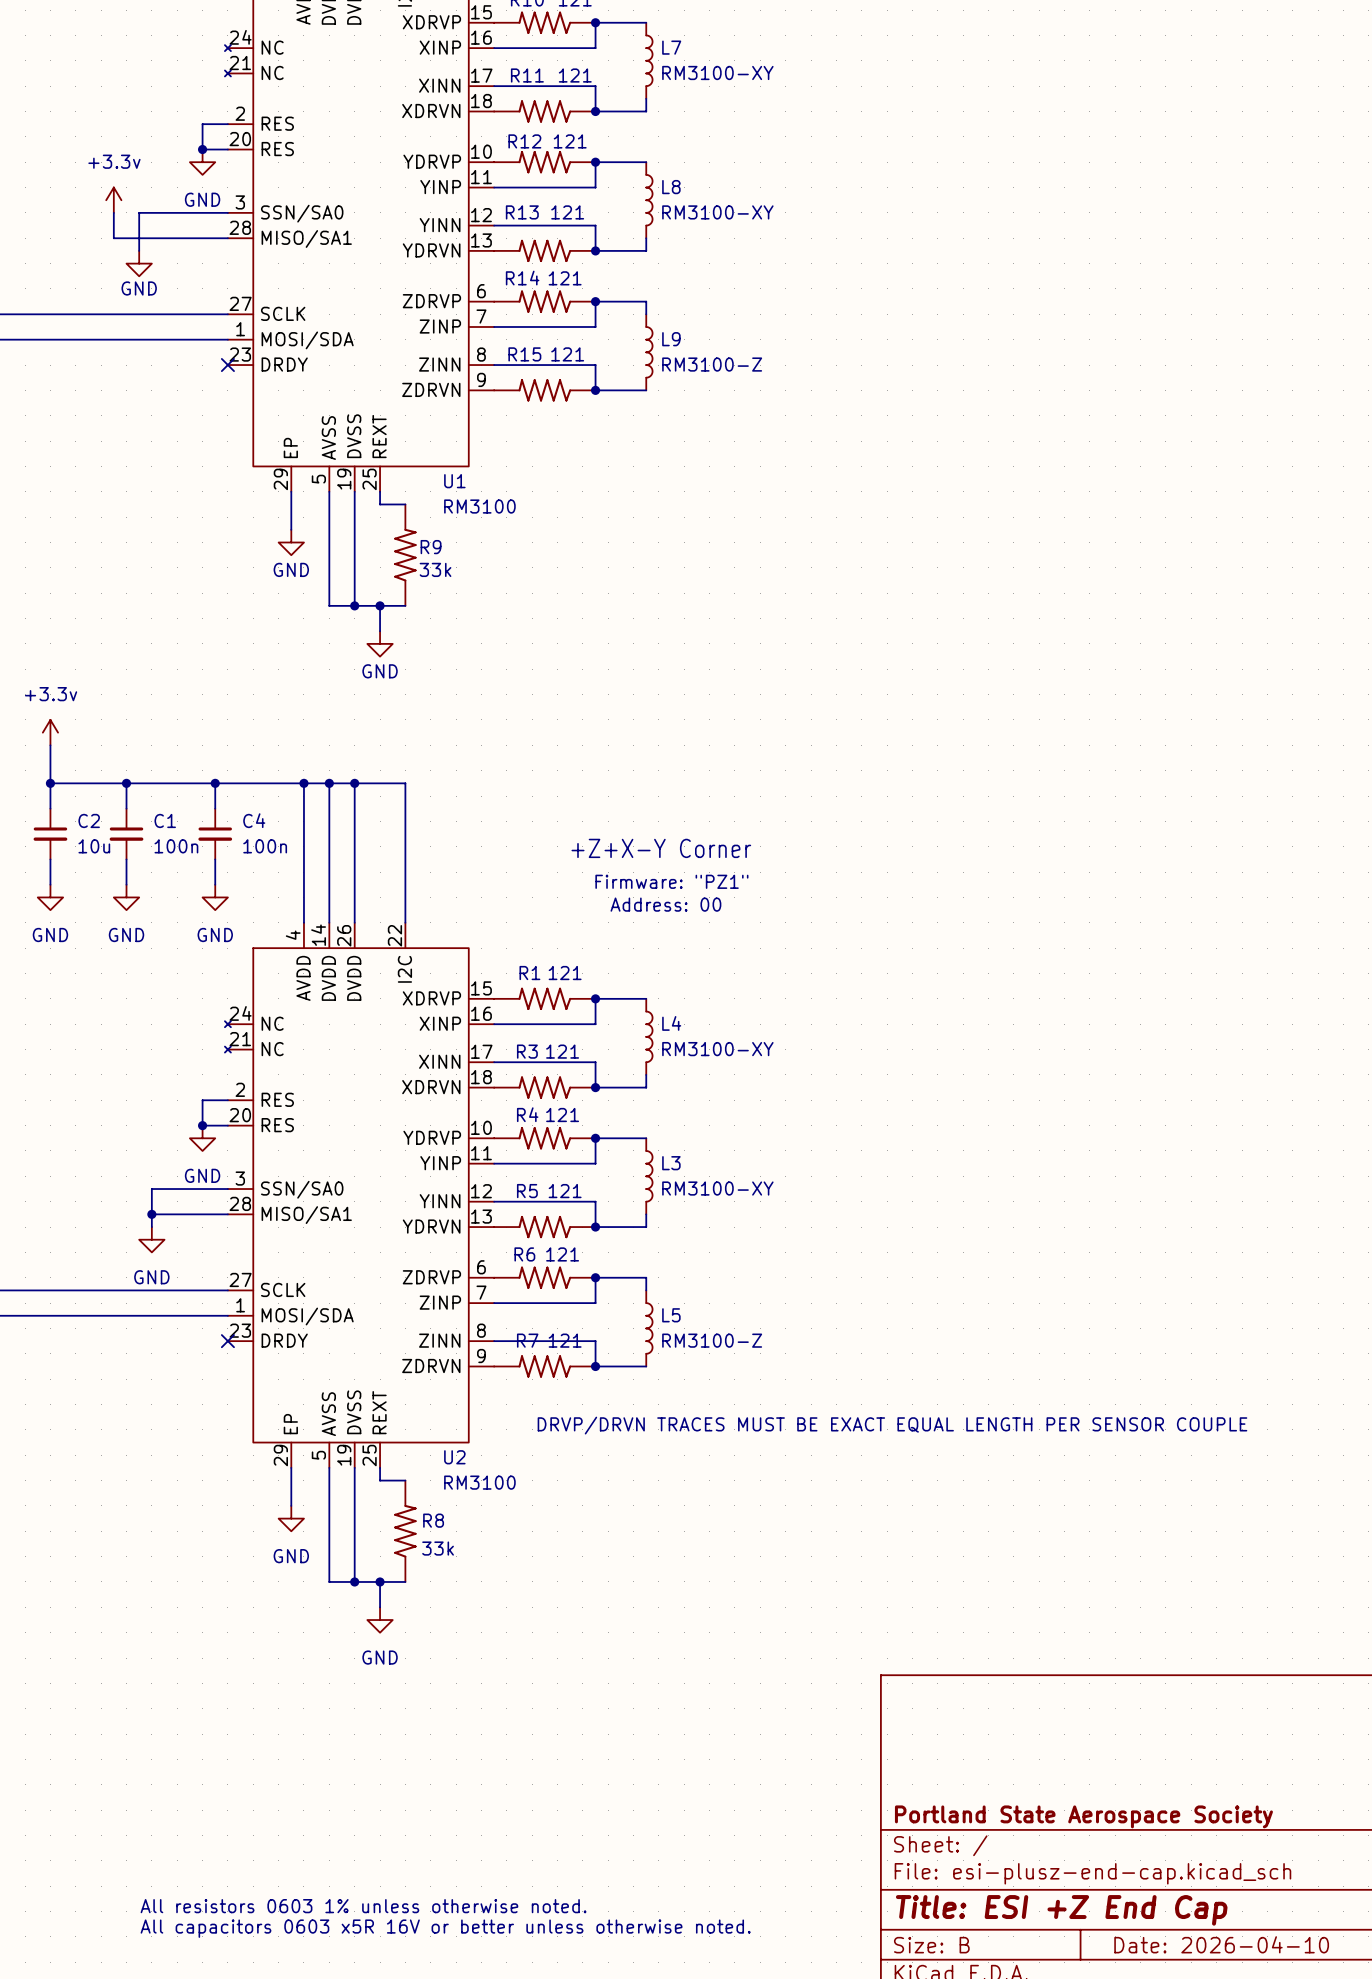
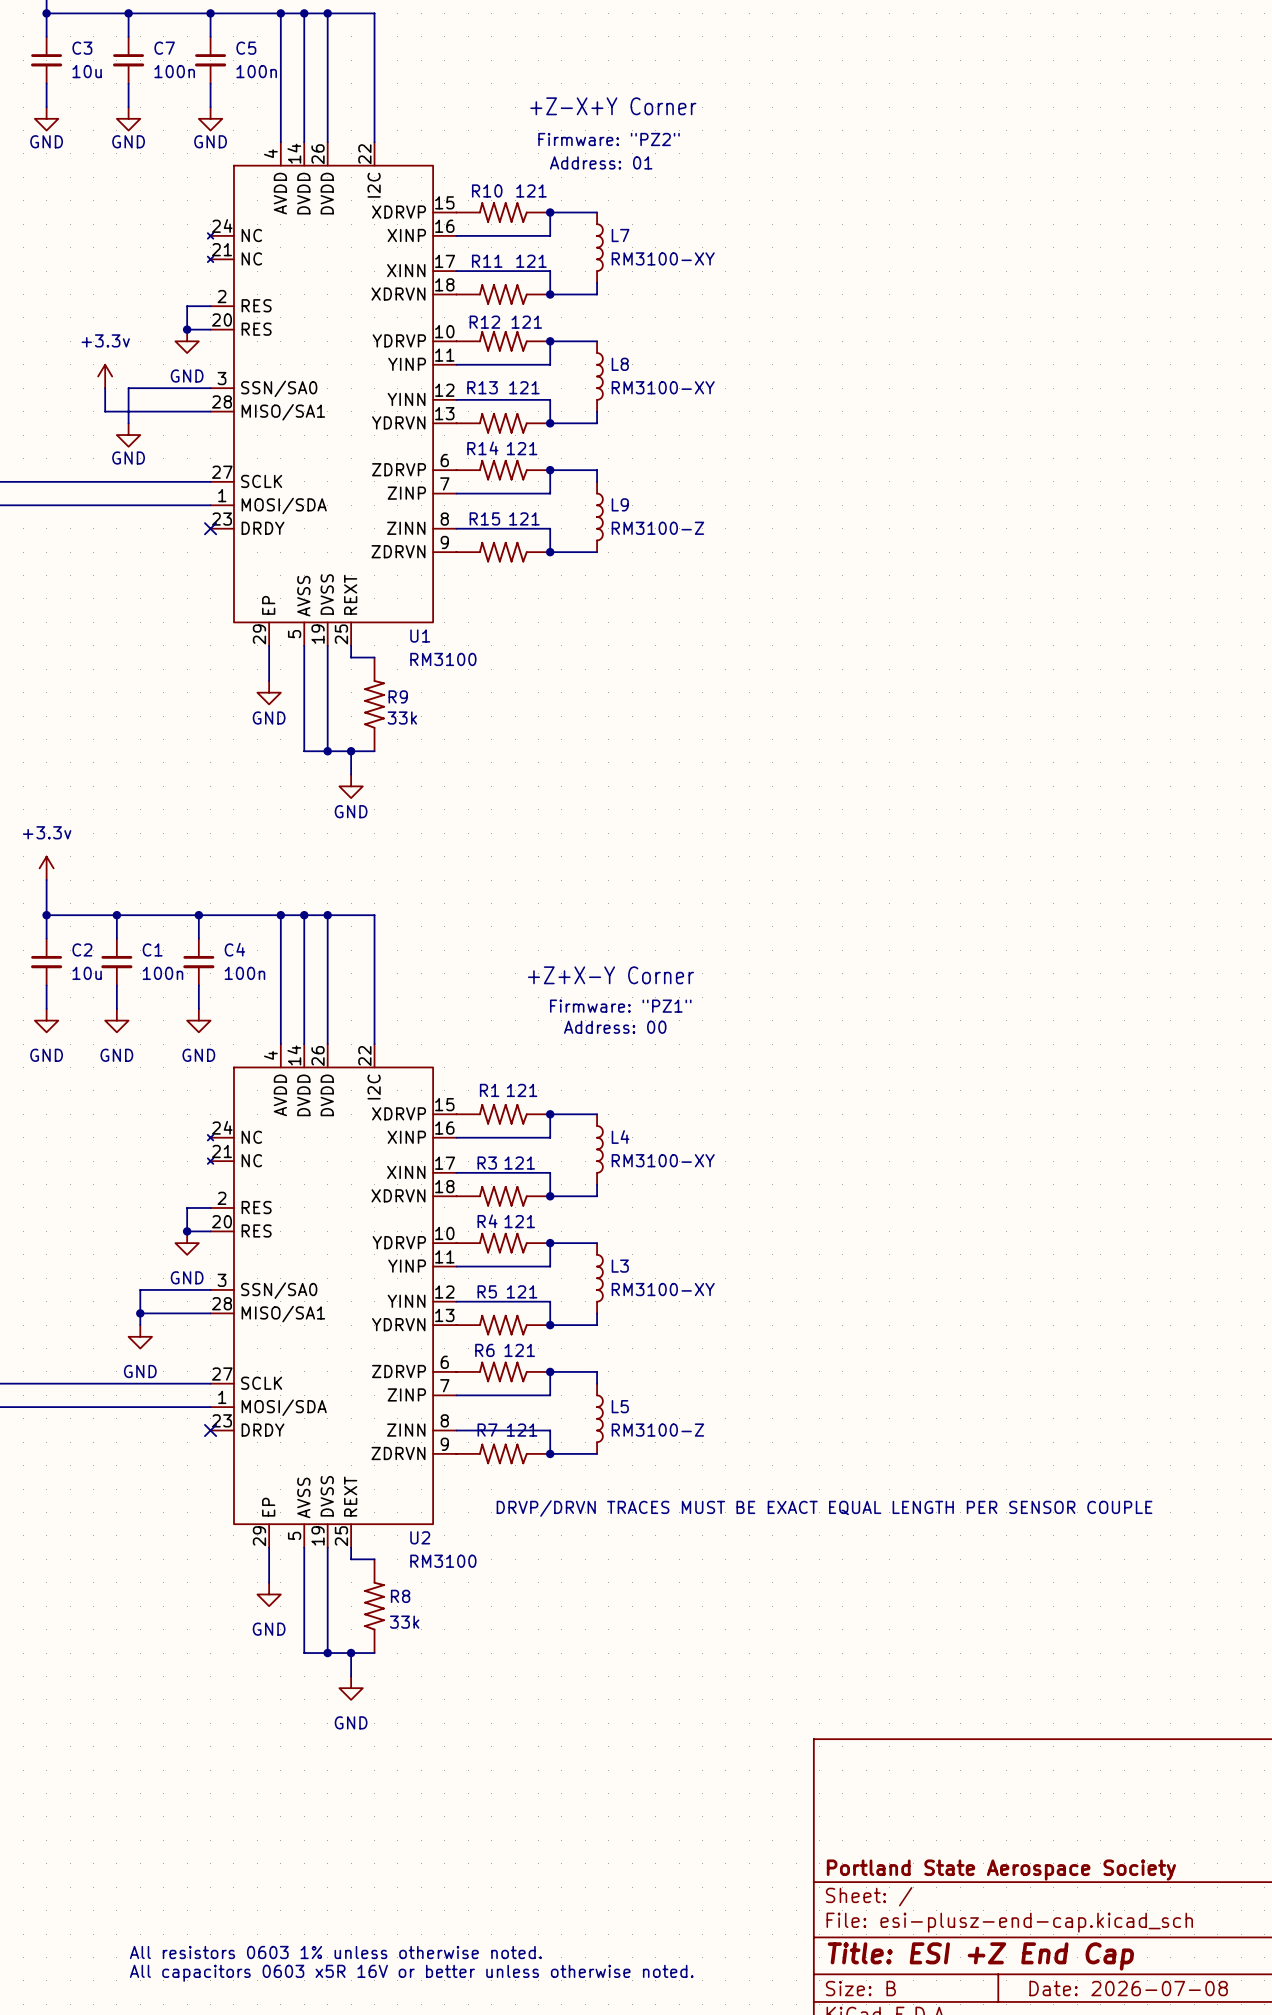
title block: Date: 2026-04-10 (1221, 1944) -> Date: 2026-07-08 (1128, 1988)

